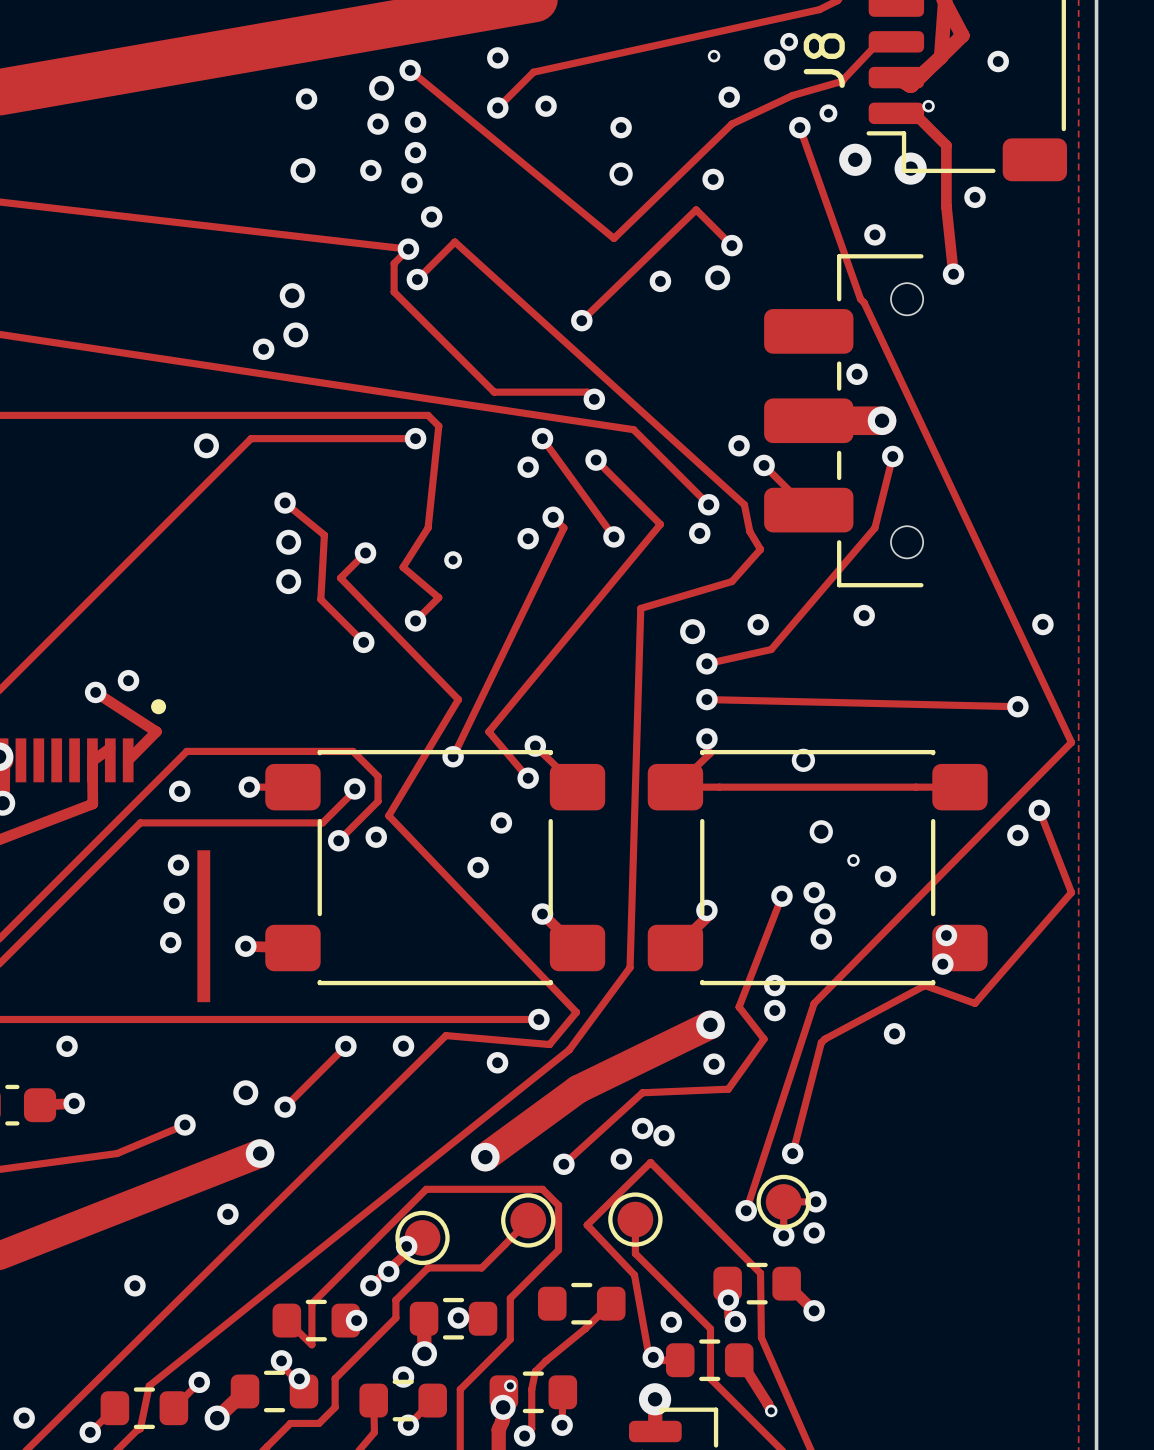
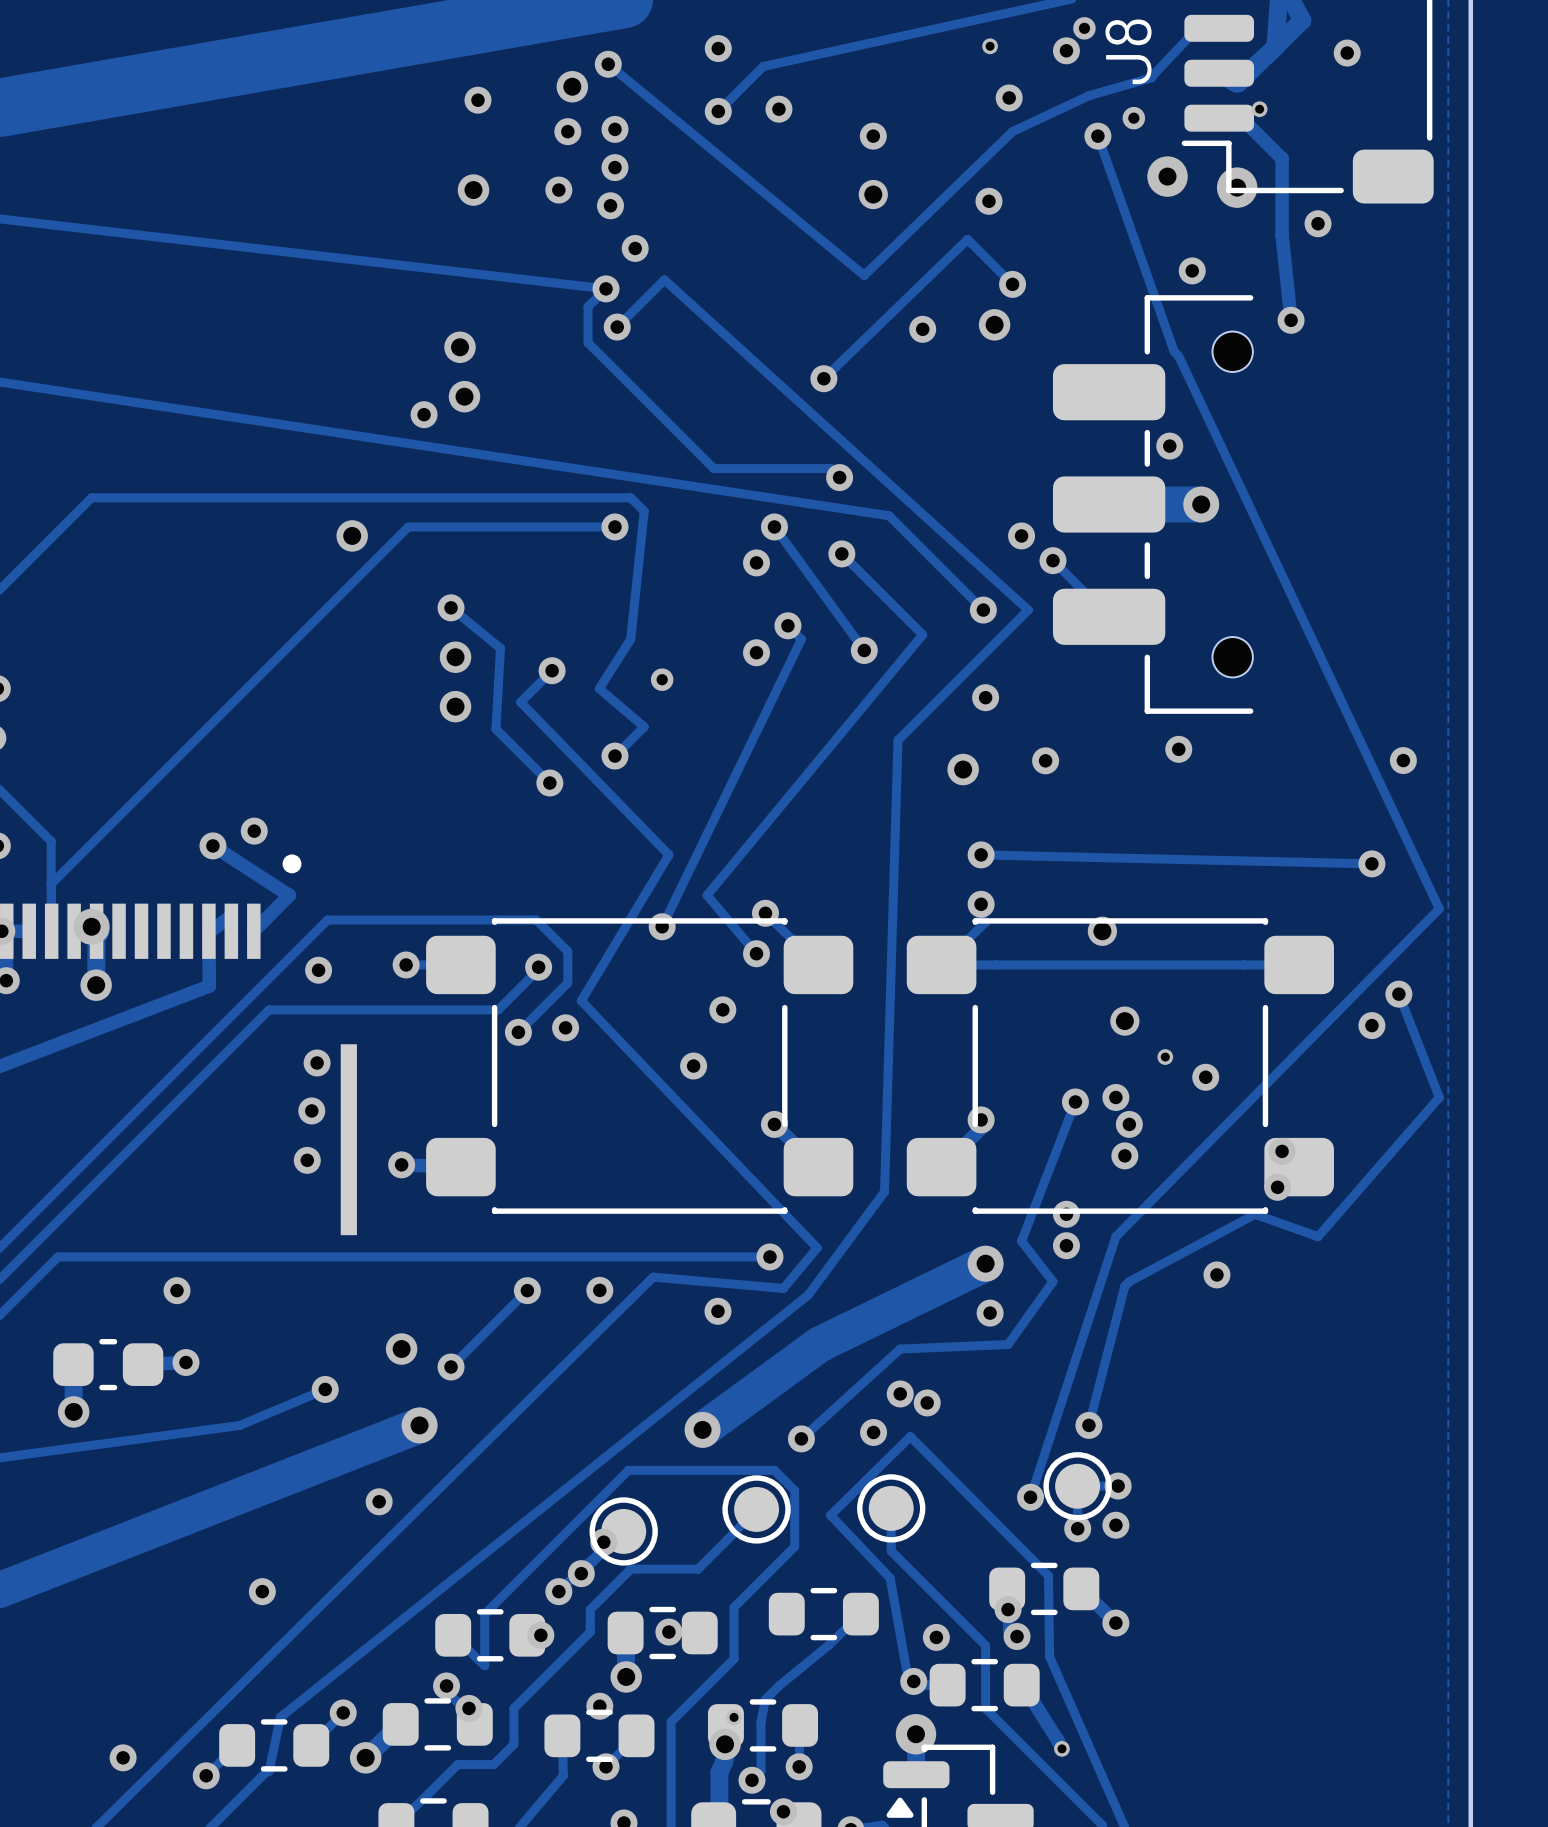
track: (892, 456) (874, 527) (771, 649) (706, 663) -> none
via: (892, 456) -> none
track: (744, 504) (749, 531) (760, 549) (731, 581) (640, 608) -> (1028, 610) (898, 740)
via position: (699, 533) -> (985, 697)
via: (706, 663) -> none

